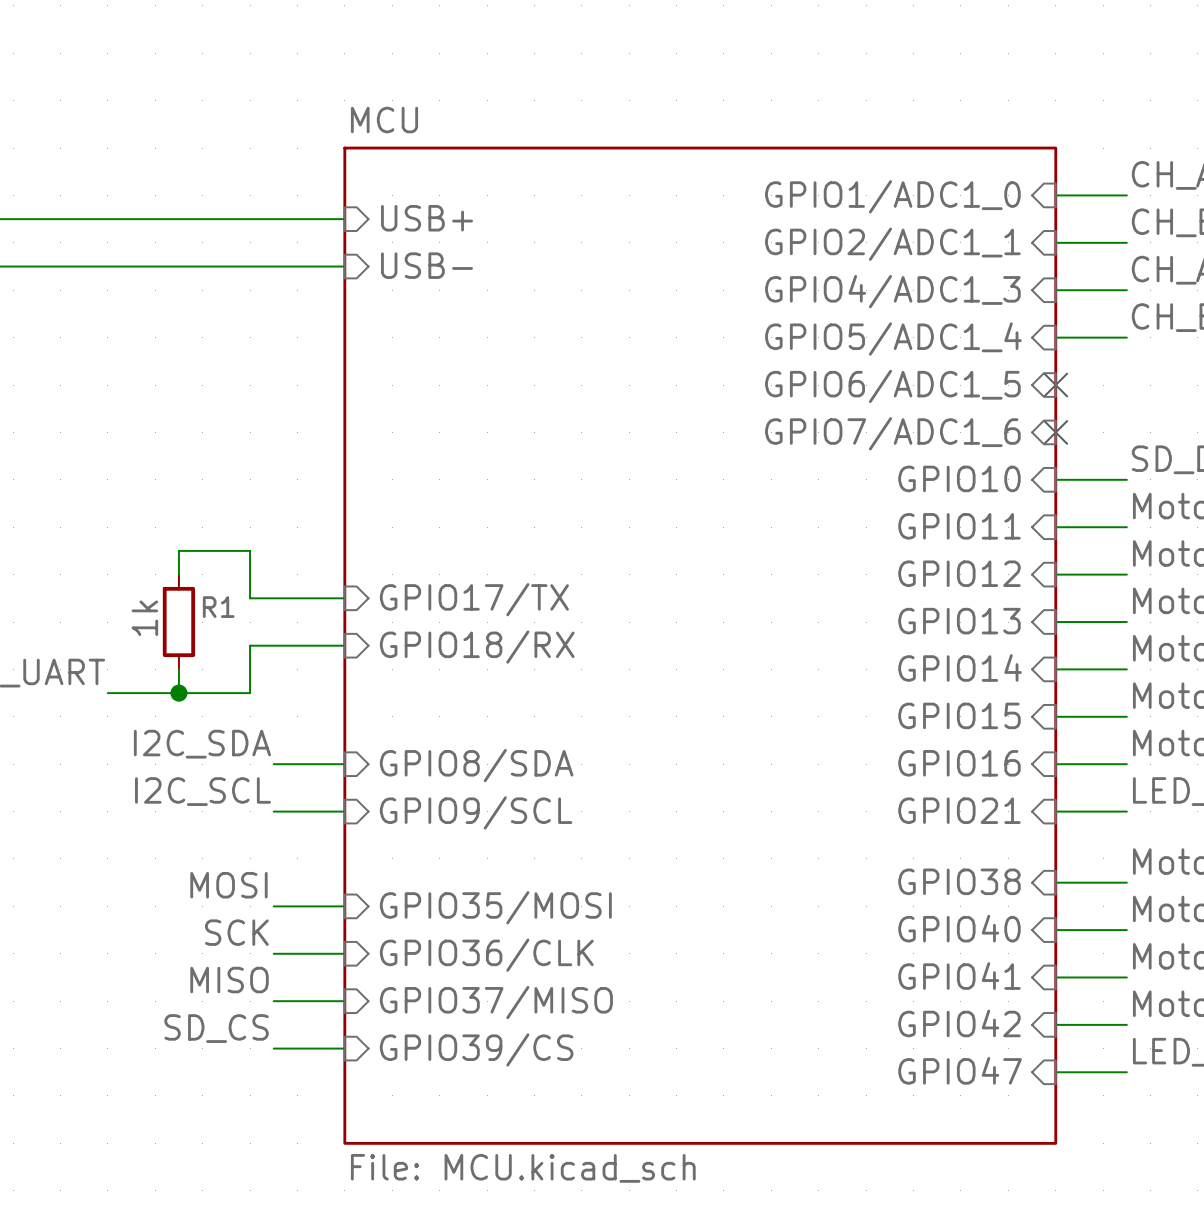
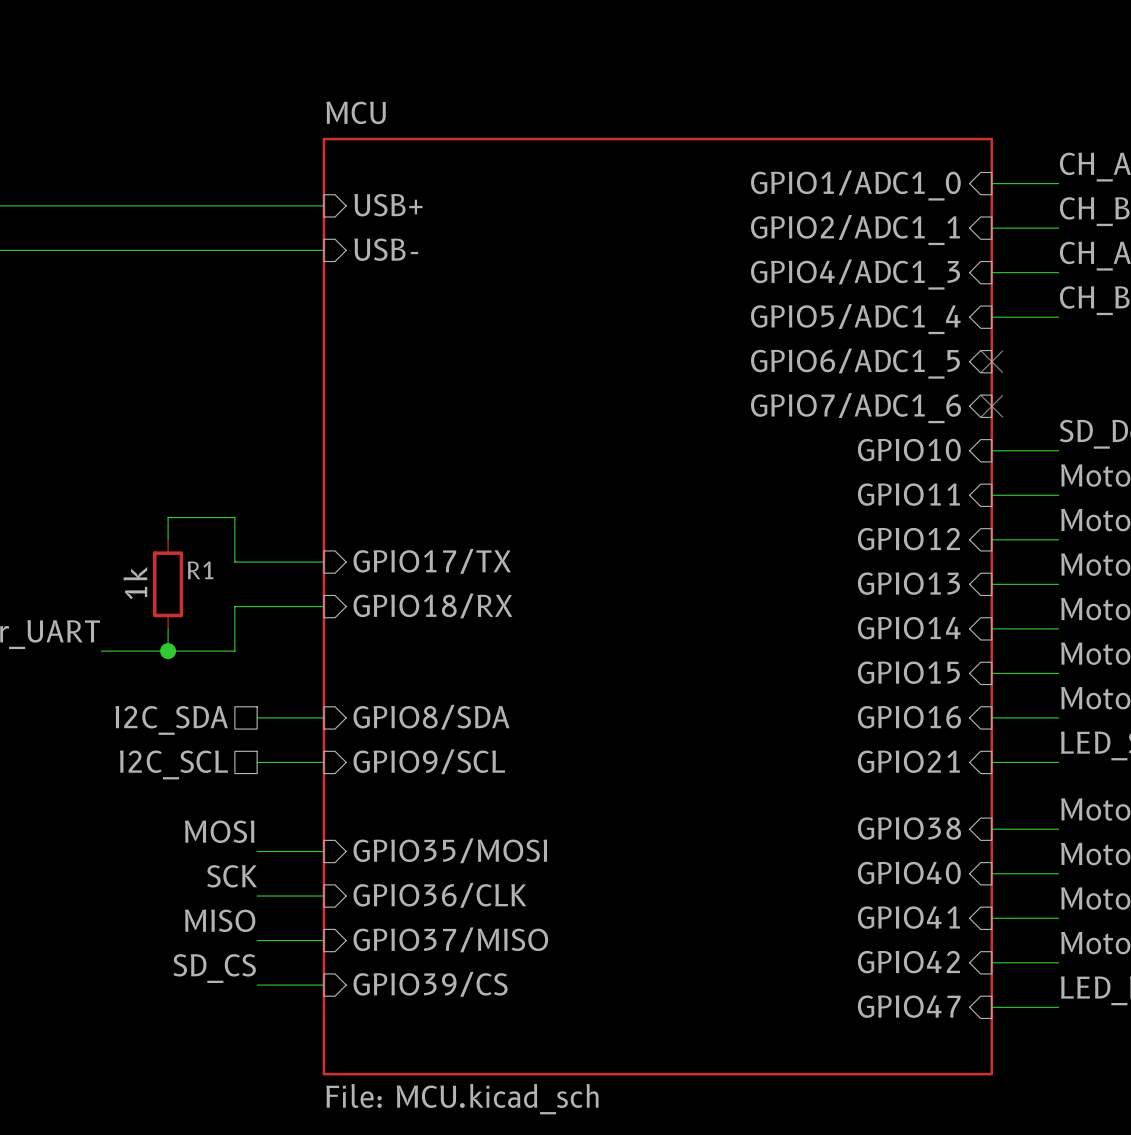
label: I2C_SDA (202, 744) -> none
hierarchical label: none -> I2C_SDA (171, 720)
label: I2C_SCL (203, 791) -> none
hierarchical label: none -> I2C_SCL (173, 764)

